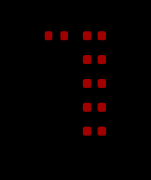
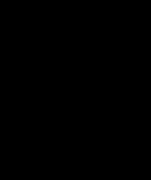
part: (56, 35) -> none
part: (94, 35) -> none
part: (94, 59) -> none
part: (94, 83) -> none
part: (94, 107) -> none
part: (94, 131) -> none

